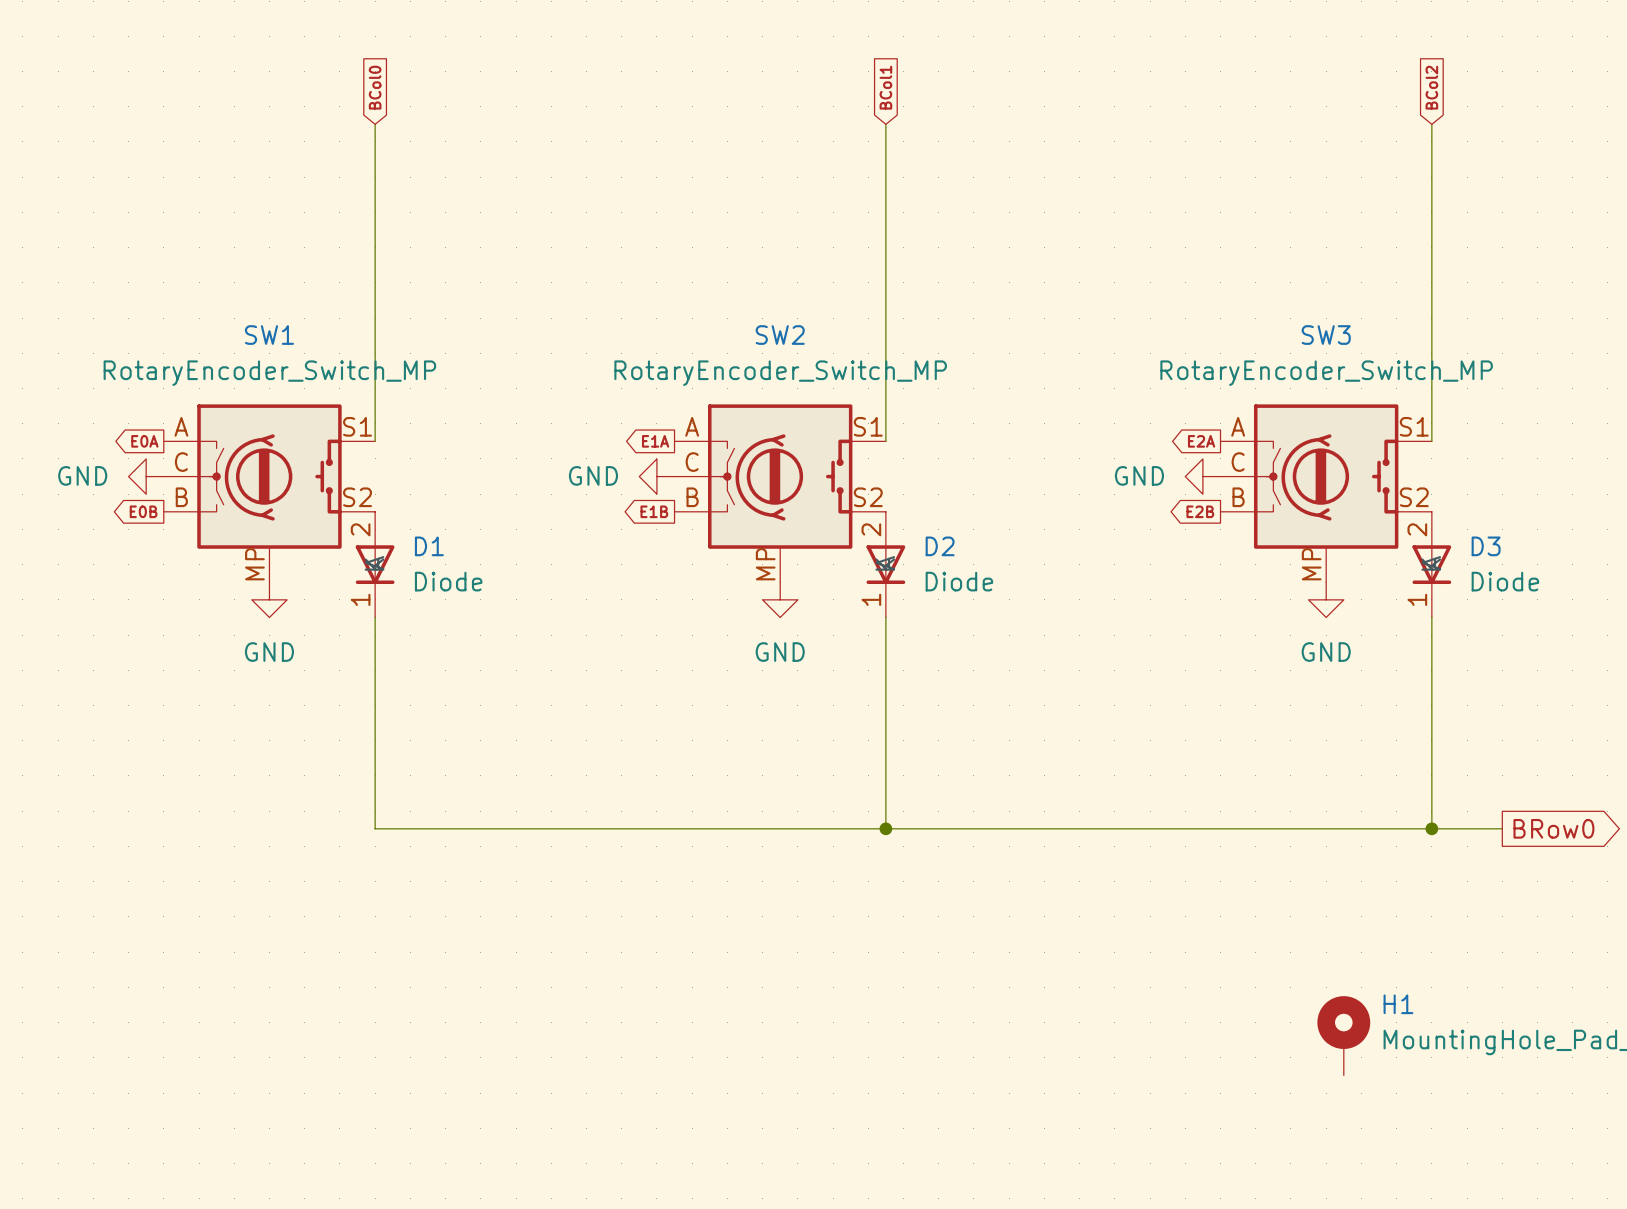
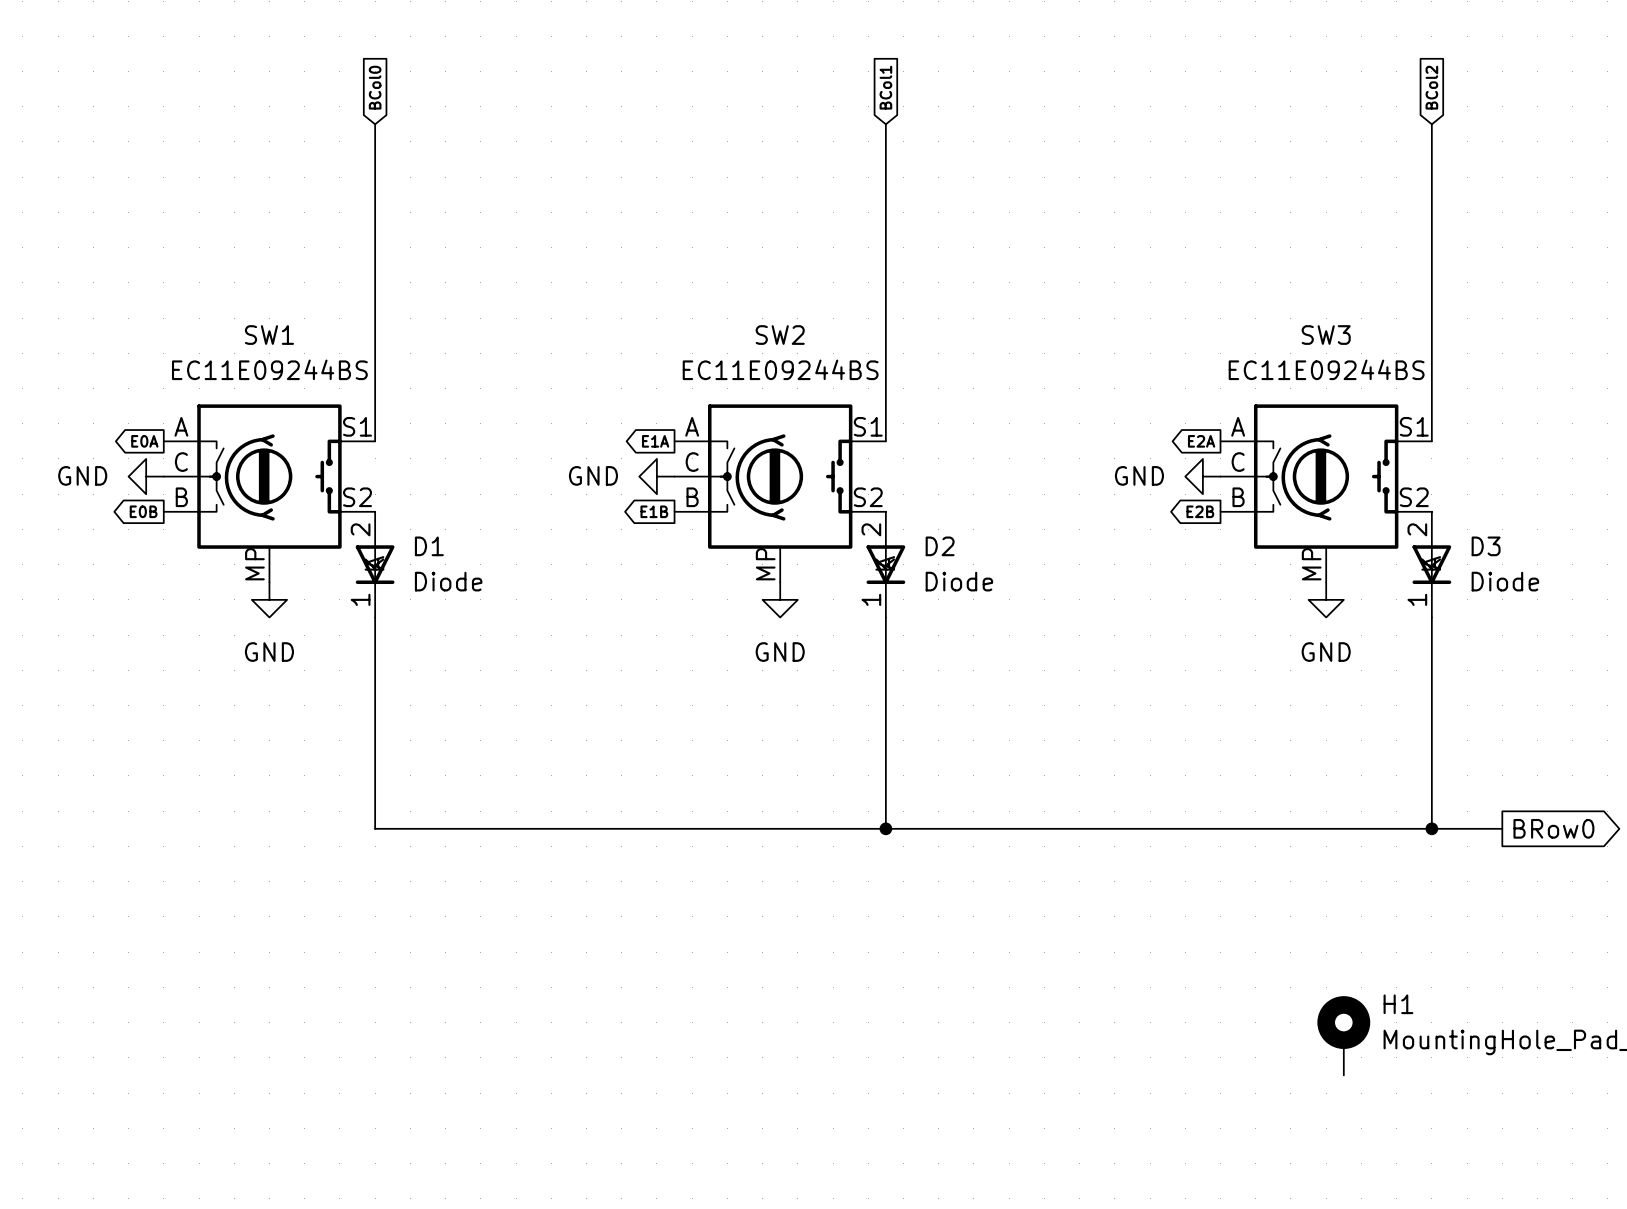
SW1 value: RotaryEncoder_Switch_MP (269, 373) -> EC11E09244BS (269, 369)
SW2 value: RotaryEncoder_Switch_MP (780, 373) -> EC11E09244BS (780, 369)
SW3 value: RotaryEncoder_Switch_MP (1326, 373) -> EC11E09244BS (1326, 369)

